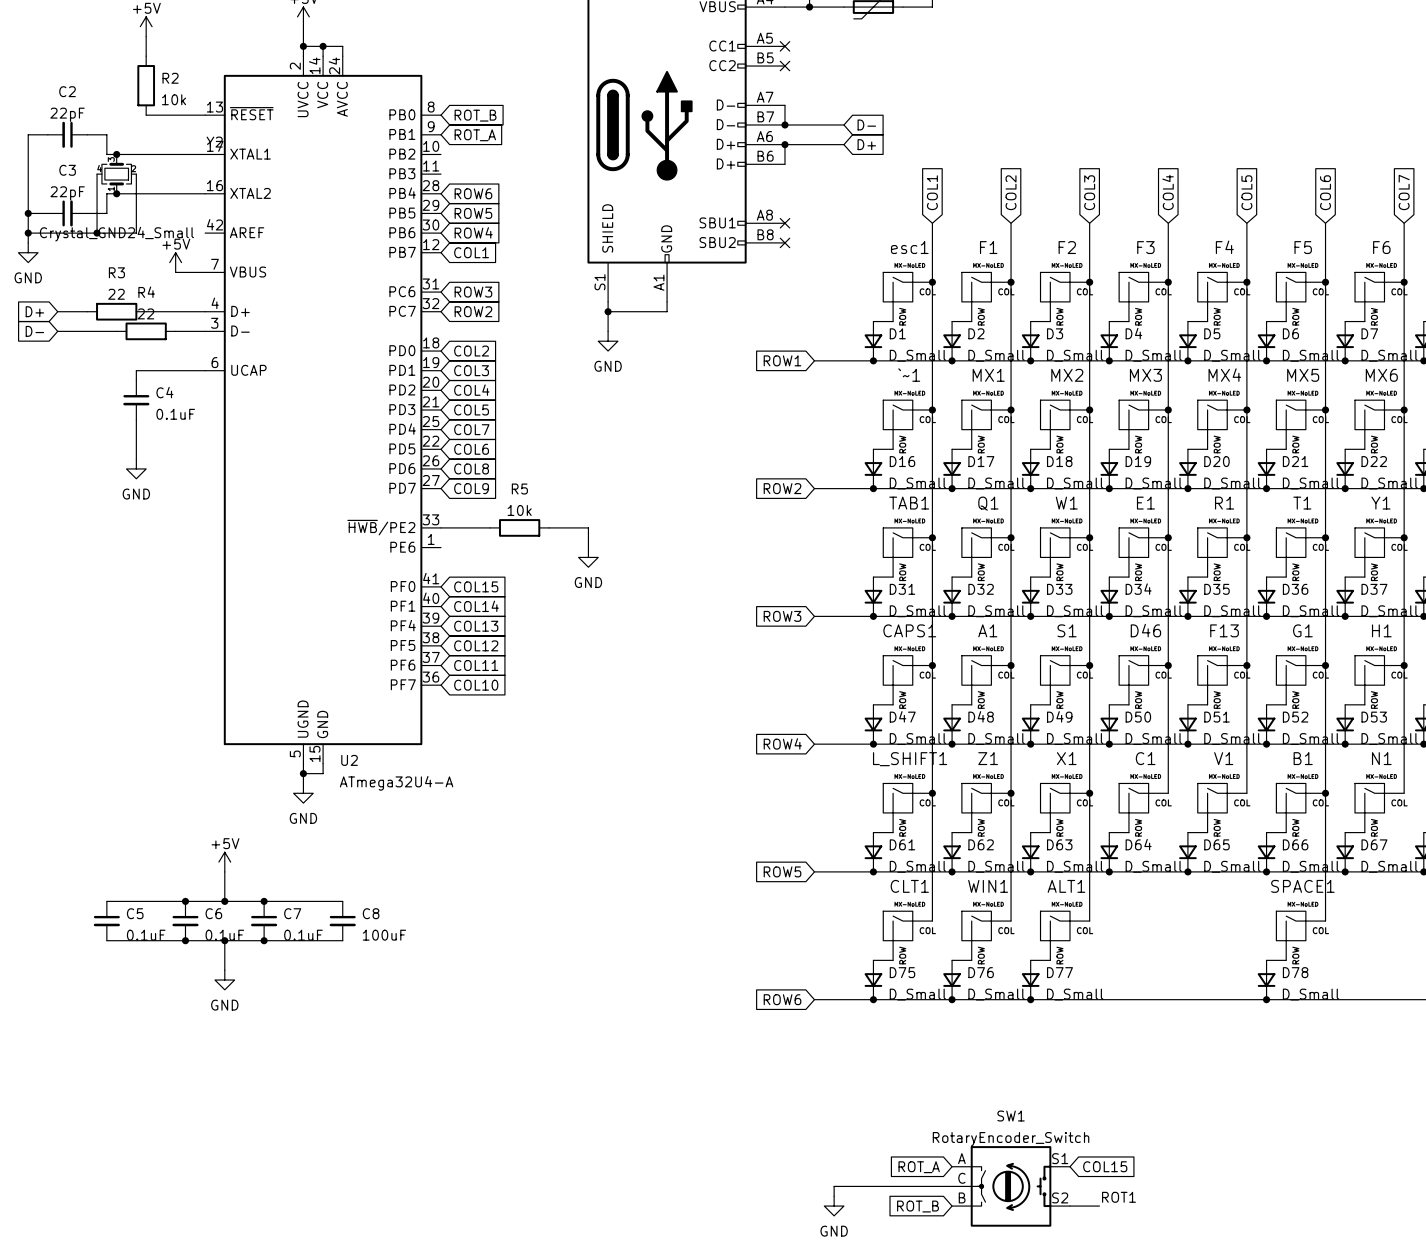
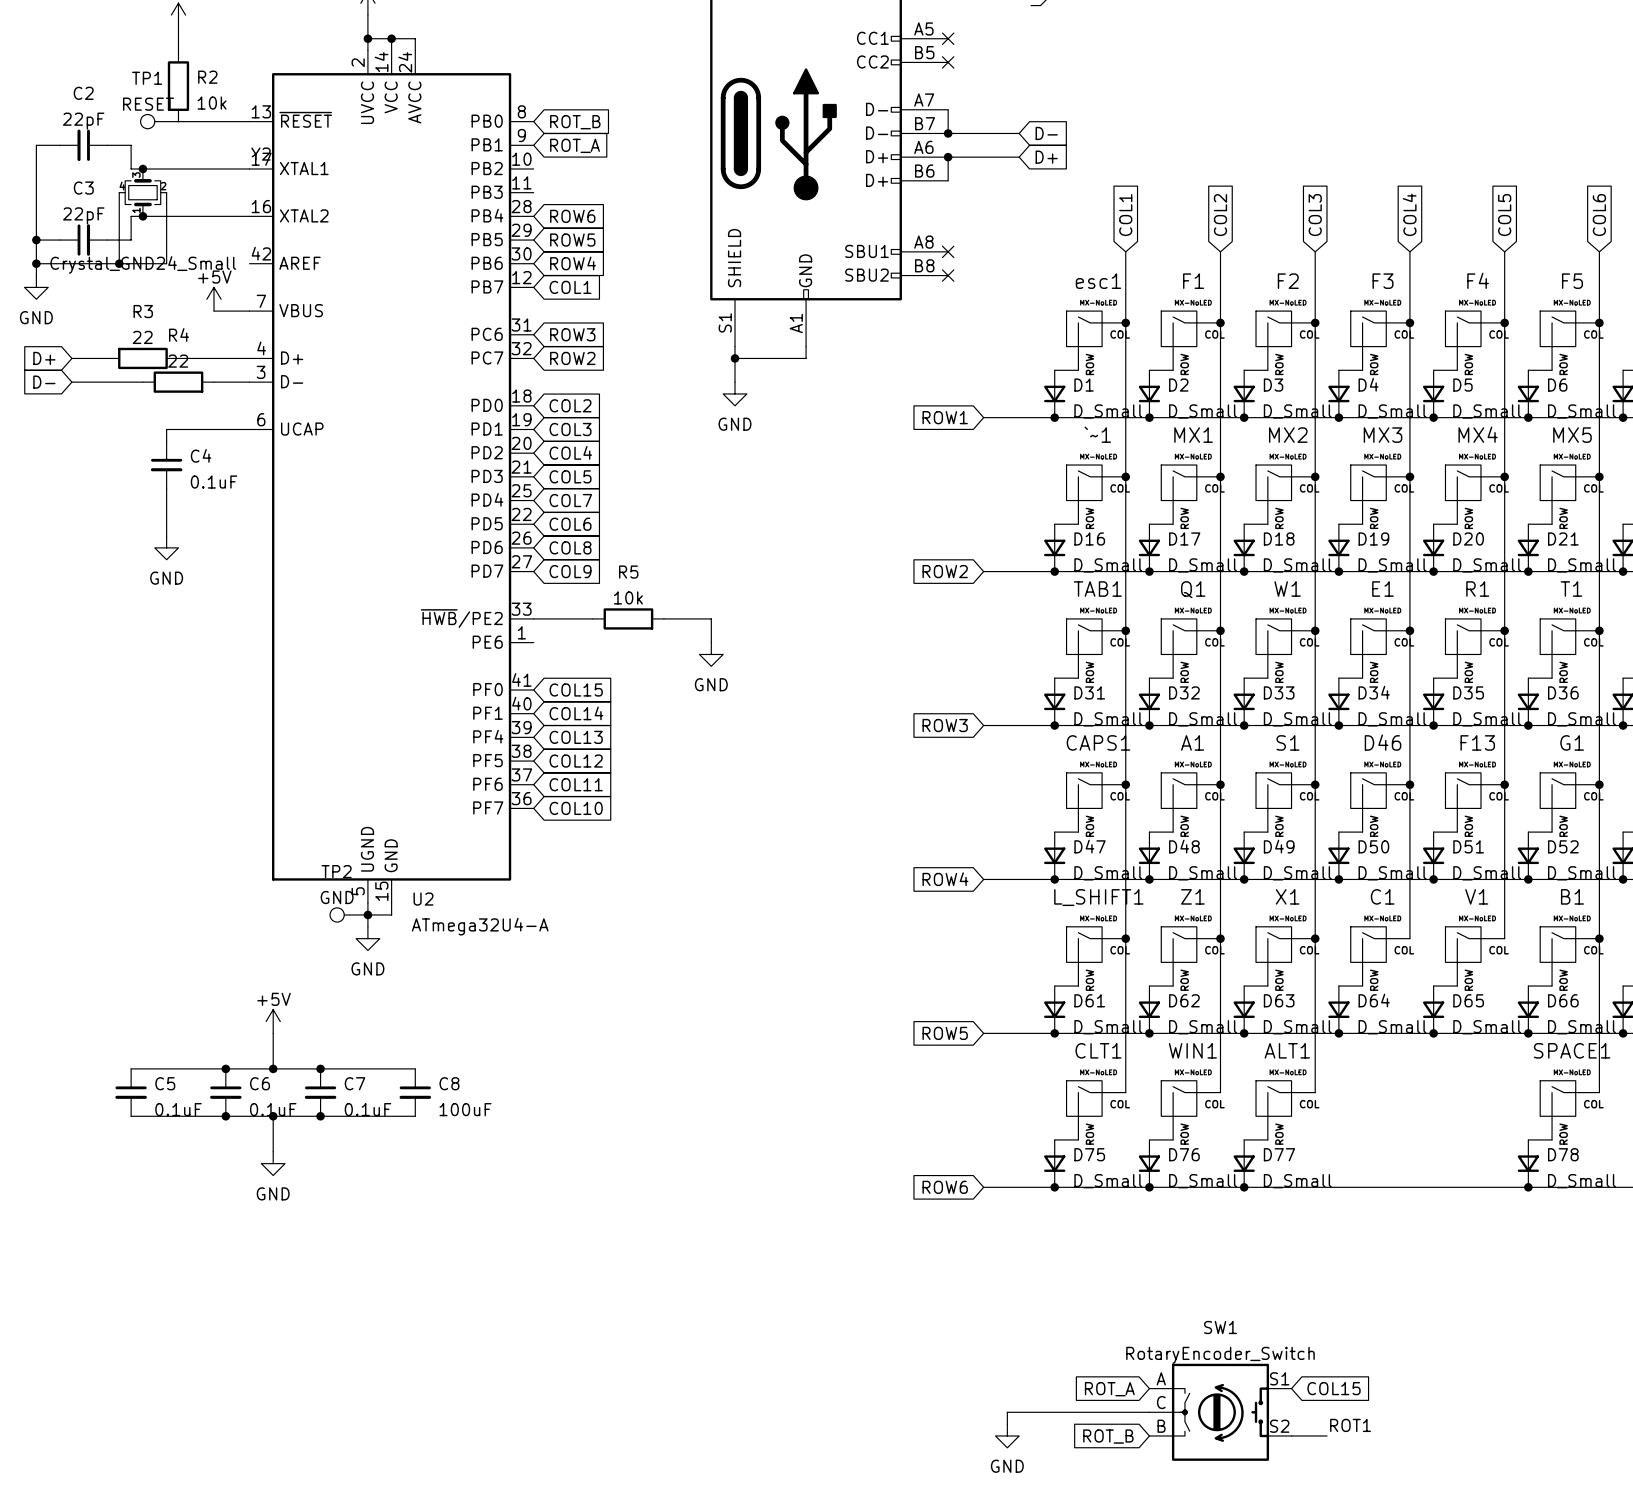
TP1: none -> RESET (159, 121)
TP2: none -> GND (348, 914)

